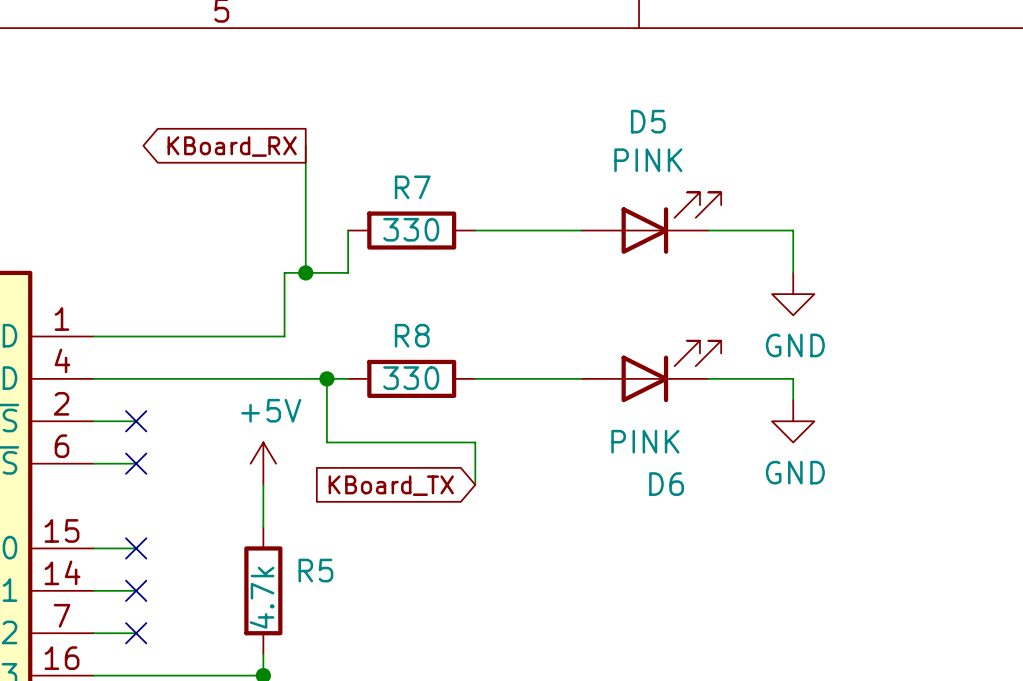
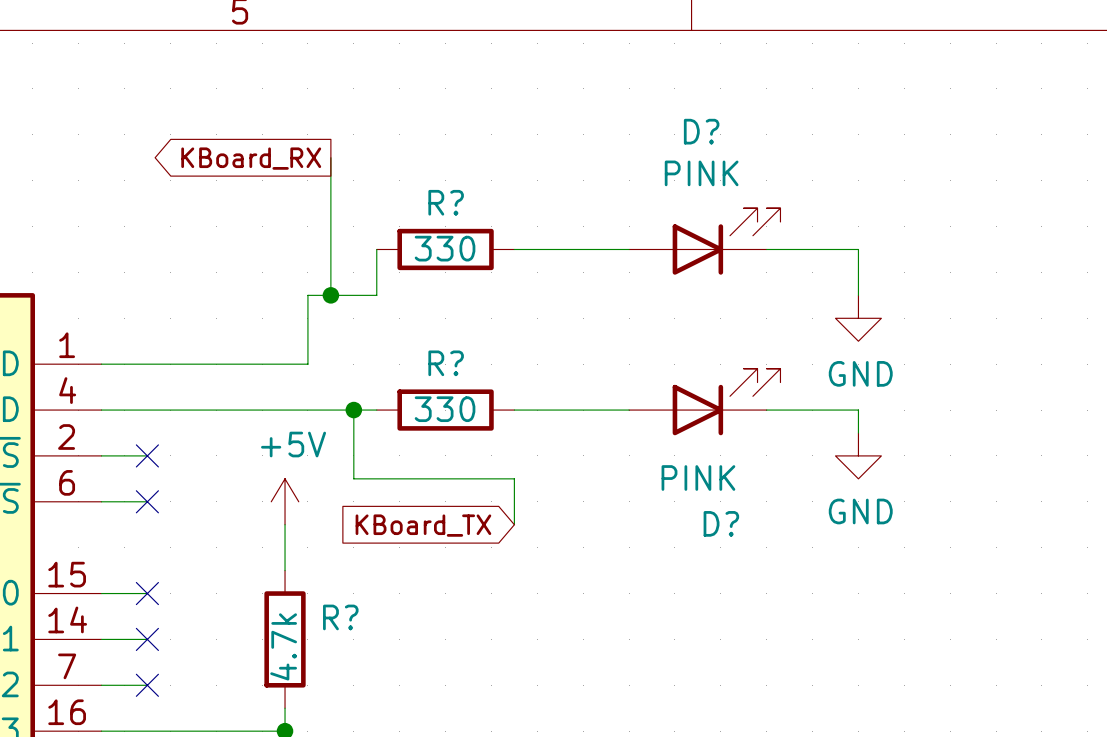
D5 name: D5 (648, 121) -> D? (701, 131)
R7 name: R7 (412, 187) -> R? (446, 202)
R8 name: R8 (412, 335) -> R? (446, 363)
D6 name: D6 (666, 484) -> D? (721, 523)
R5 name: R5 (315, 570) -> R? (340, 617)

